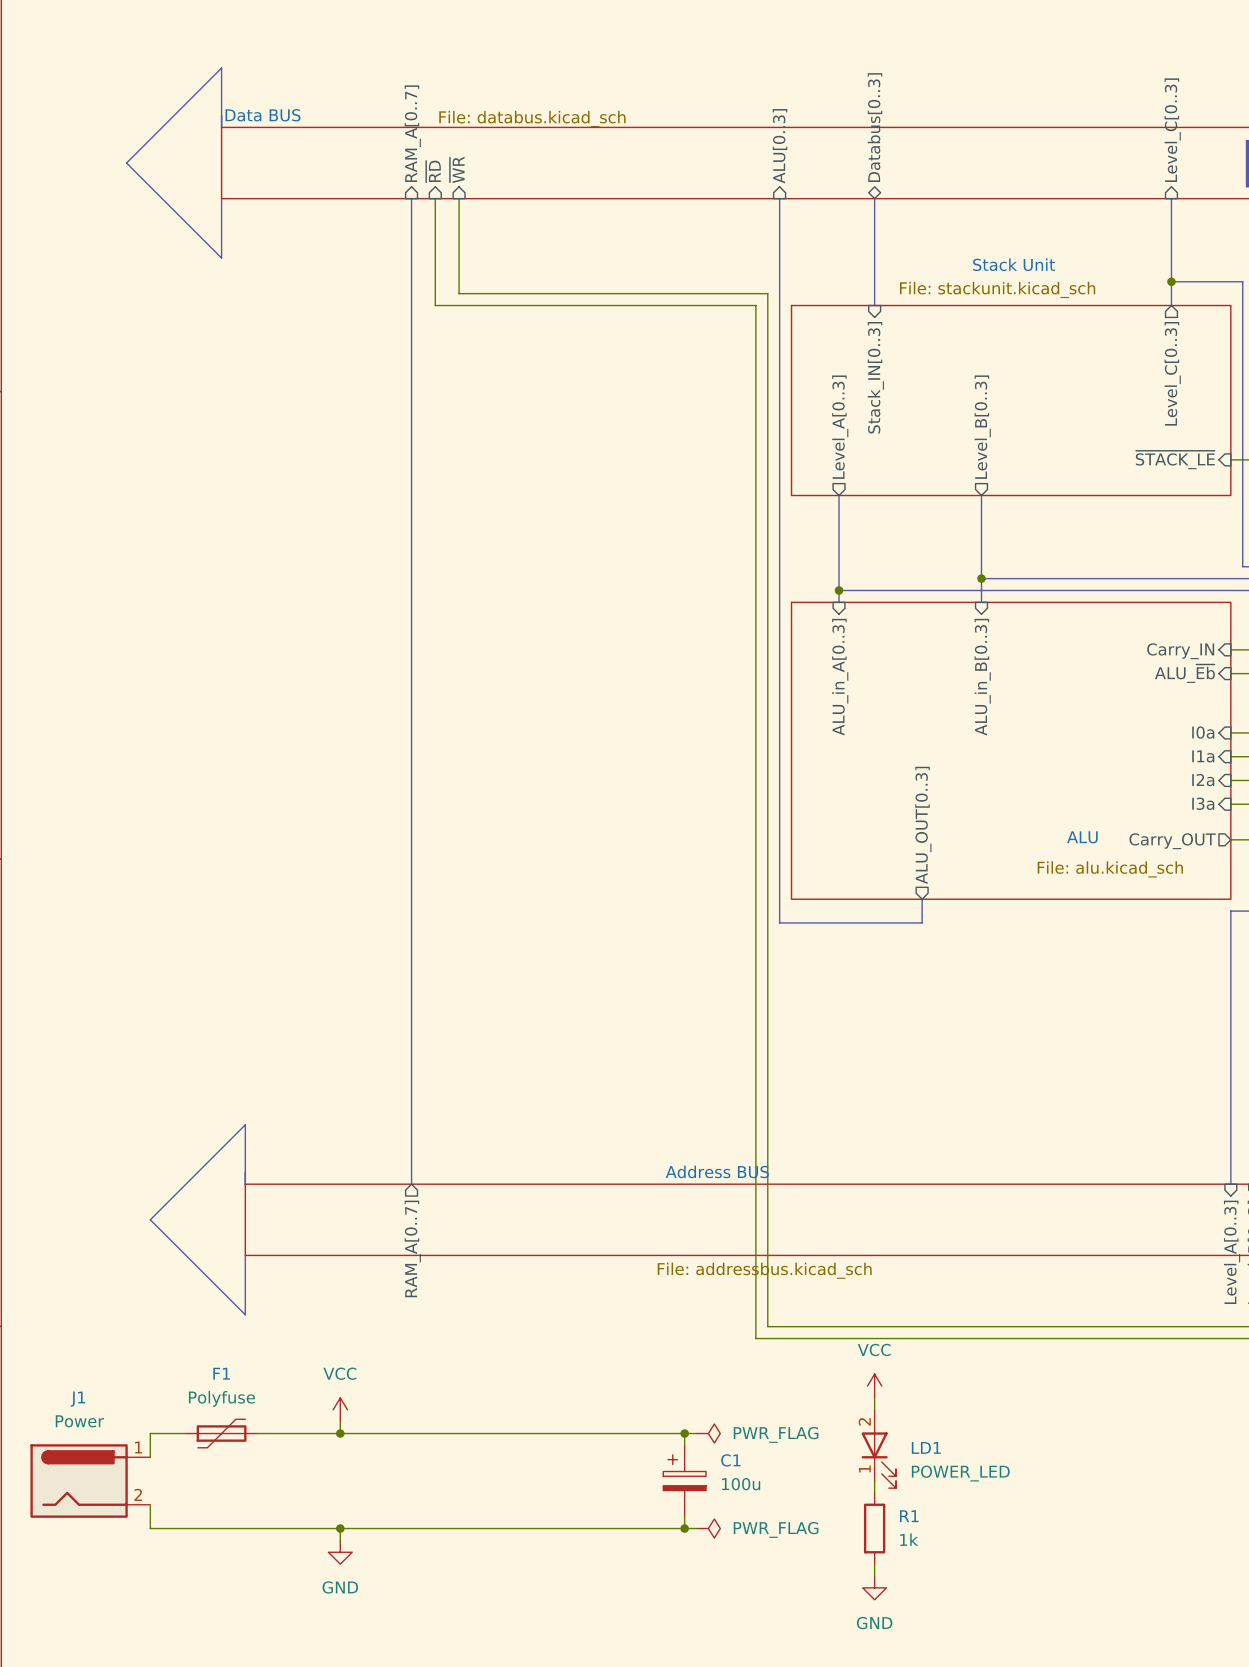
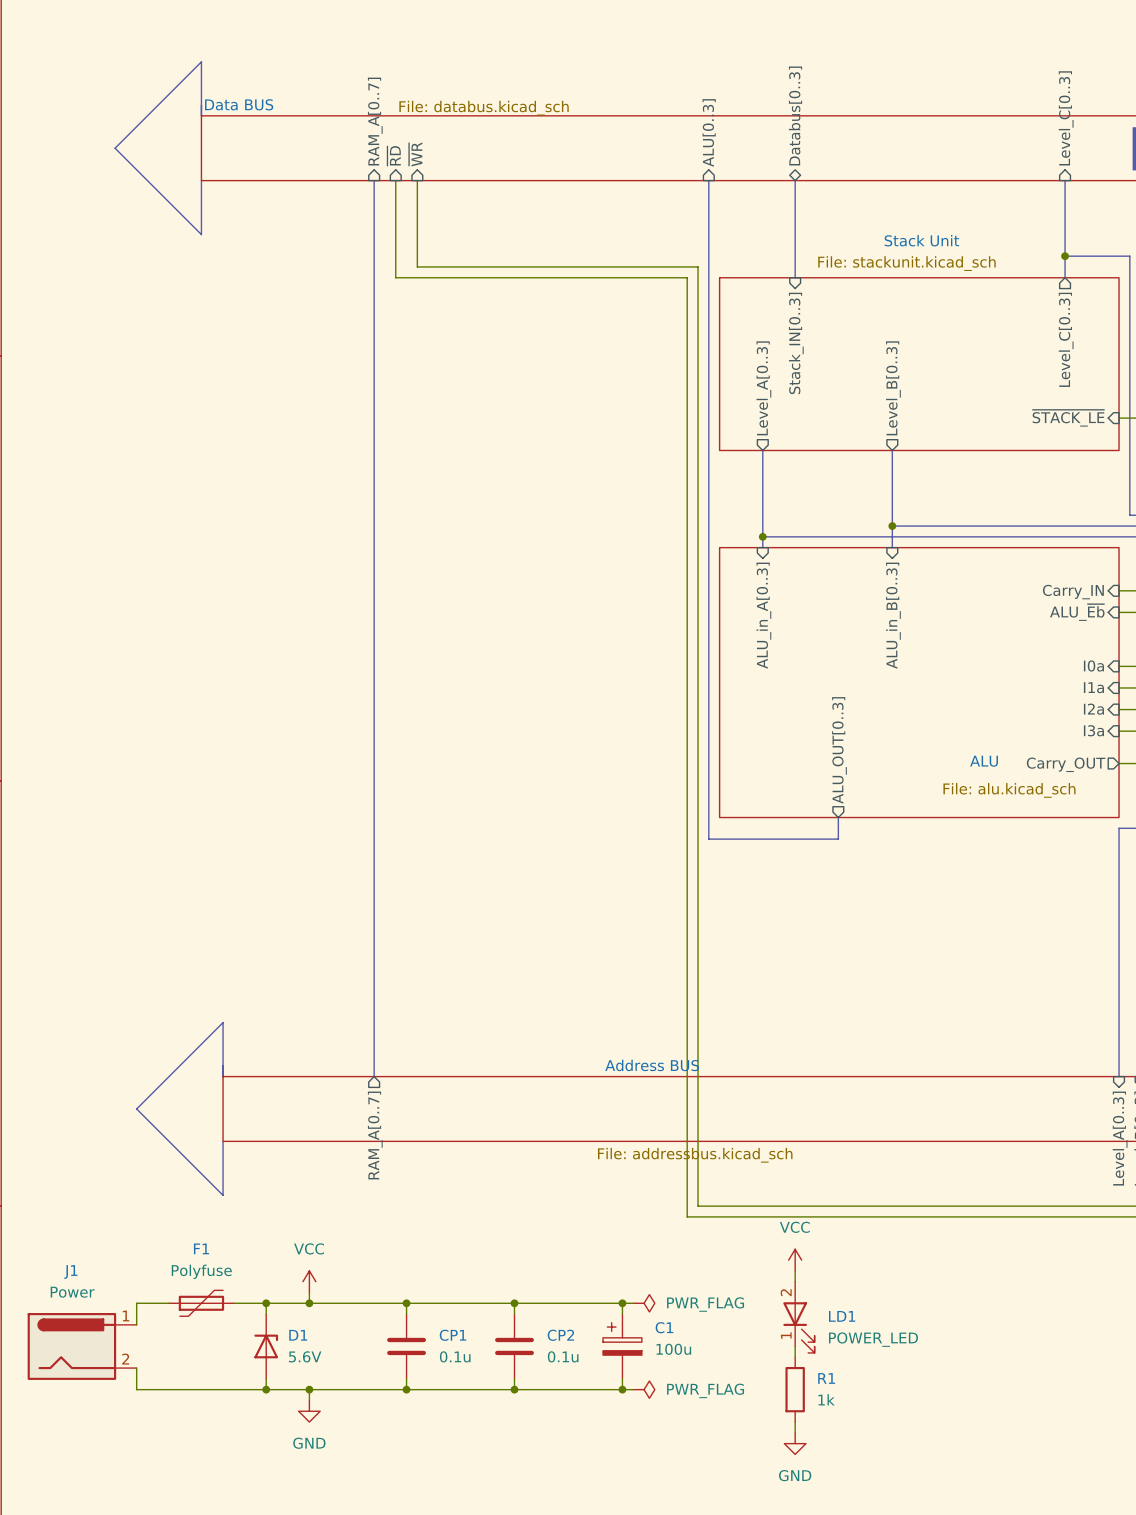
wire: none -> (266, 1303) (266, 1314)
junction: none -> (266, 1303)
wire: none -> (406, 1303) (406, 1314)
junction: none -> (406, 1303)
wire: none -> (514, 1303) (514, 1314)
junction: none -> (514, 1303)
D1: none -> 5.6V (266, 1346)
CP1: none -> 0.1u (406, 1346)
CP2: none -> 0.1u (514, 1346)
wire: none -> (266, 1378) (266, 1389)
wire: none -> (406, 1378) (406, 1389)
wire: none -> (514, 1378) (514, 1389)
junction: none -> (266, 1389)
junction: none -> (406, 1389)
junction: none -> (514, 1389)

